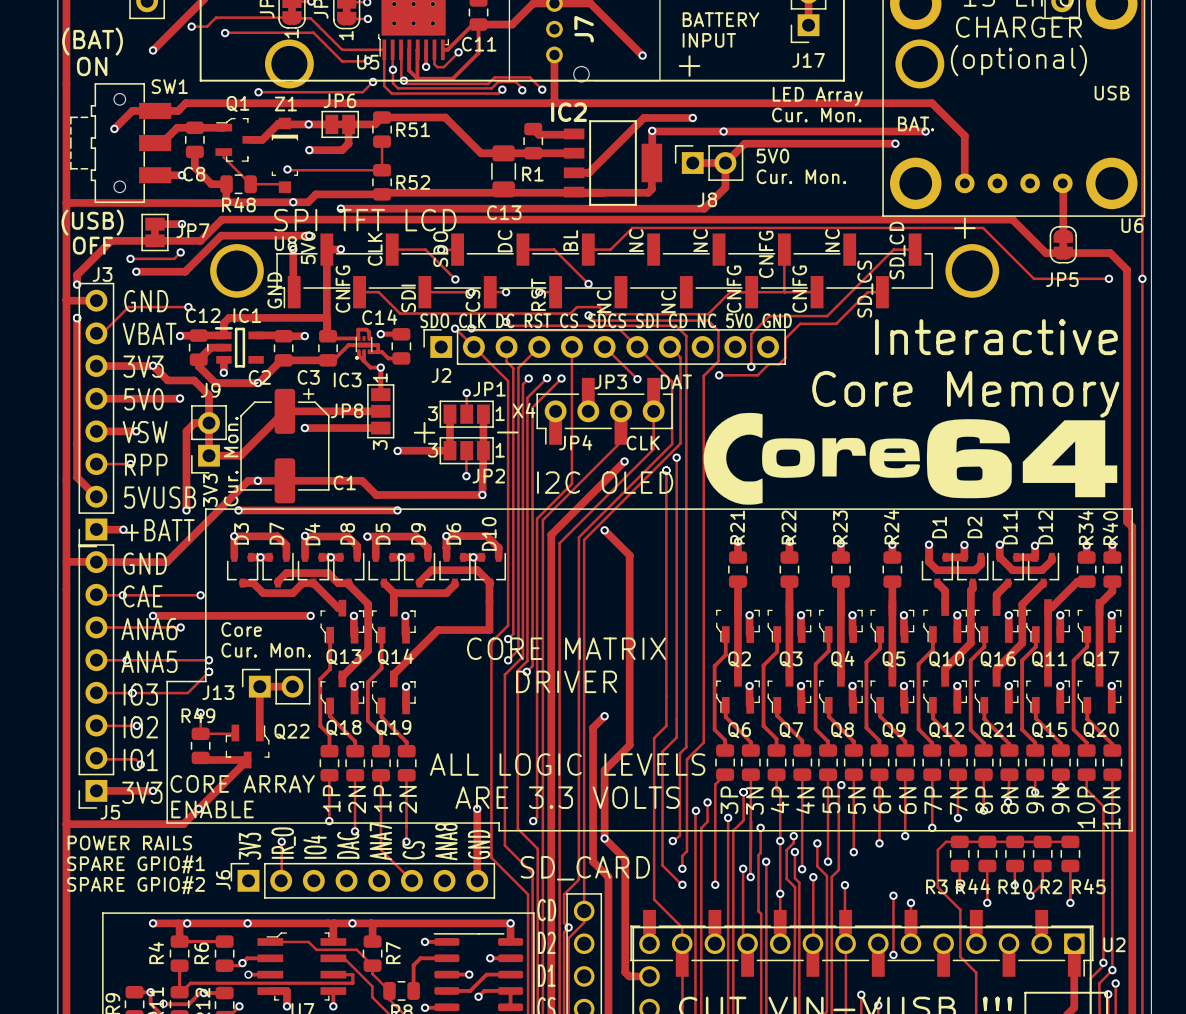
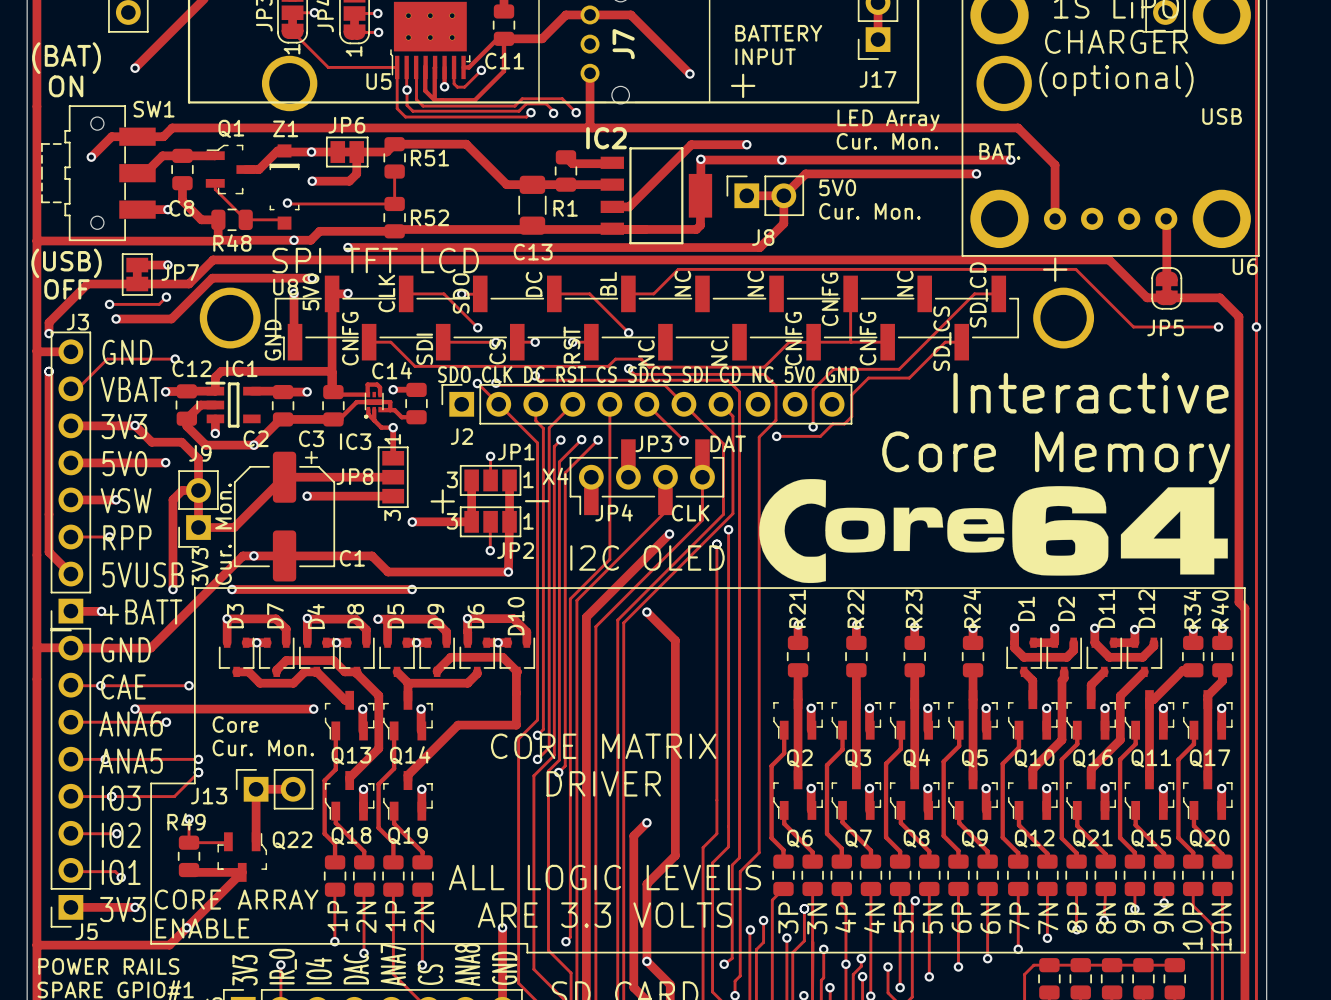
track: (191, 26) (207, 26) (216, 17) (310, 18) (342, 49) -> (292, 31) (328, 67) (349, 67)
via: (191, 26) -> none
track: (225, 33) (313, 32) (342, 61) (367, 60) -> none
via: (225, 33) -> none
via: (367, 60) -> none
via: (403, 80) -> none
track: (373, 81) (362, 92) (258, 92) -> none
via: (373, 81) -> none
via: (258, 92) -> none

